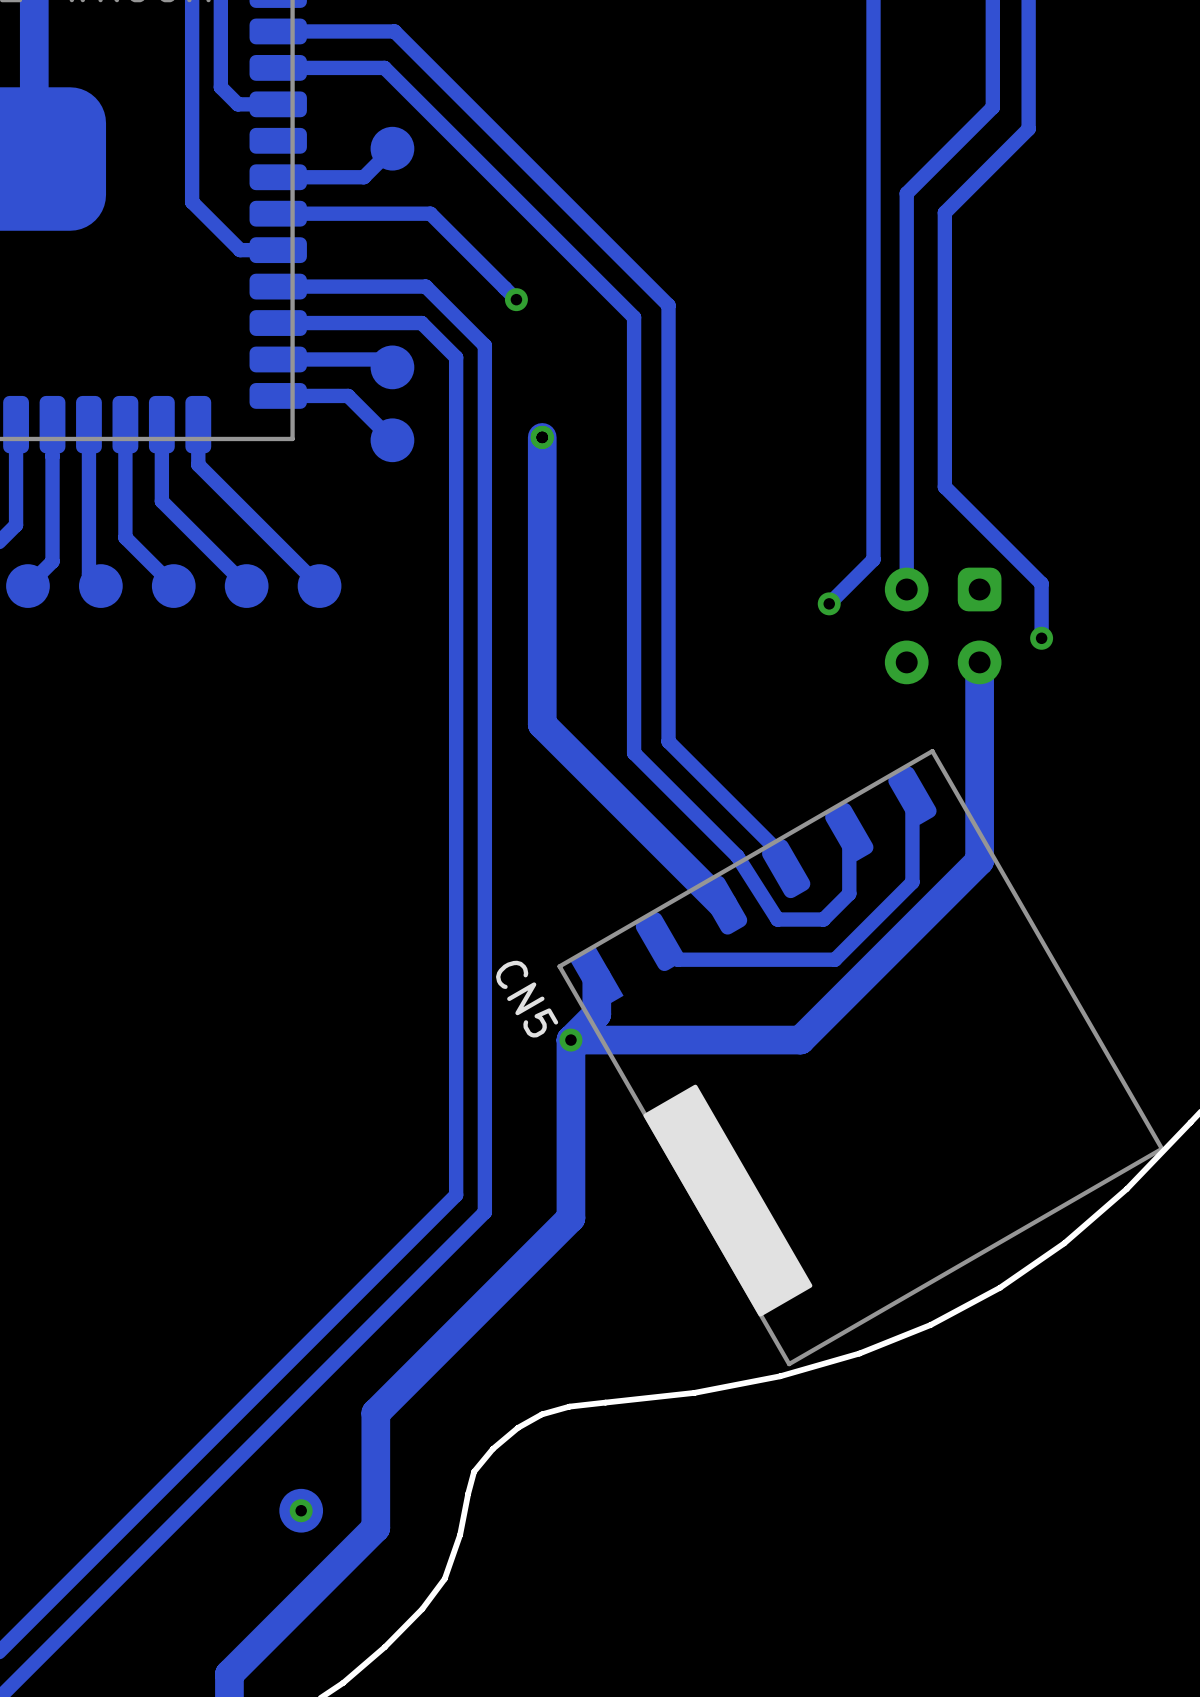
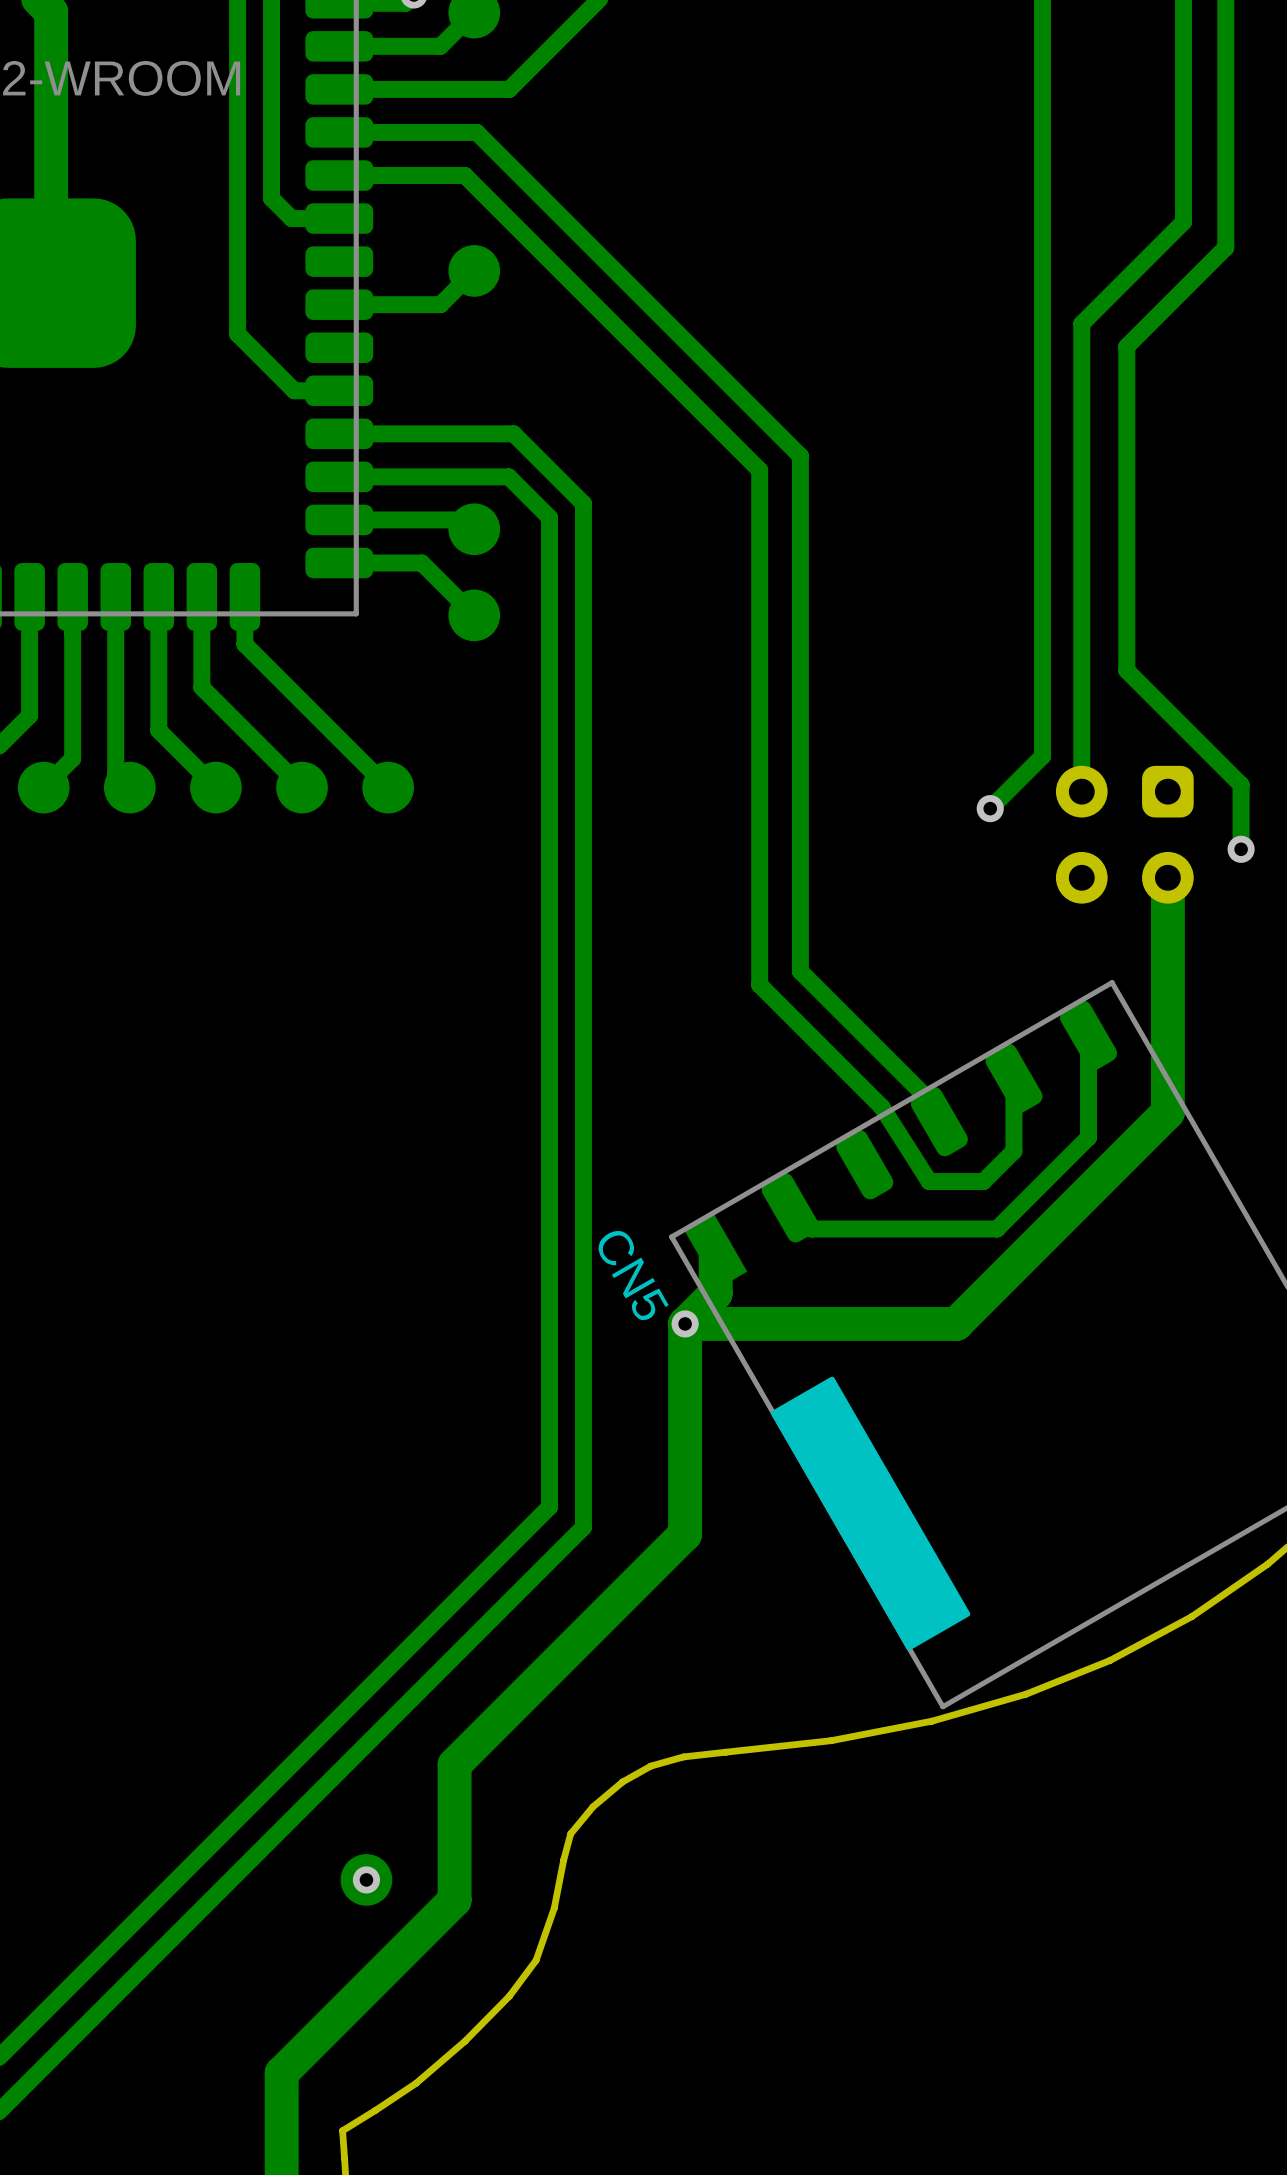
track: (278, 213) (430, 213) (516, 299) -> none
via: (516, 299) -> none
track: (542, 437) (542, 724) (723, 905) -> none
via: (542, 437) -> none

